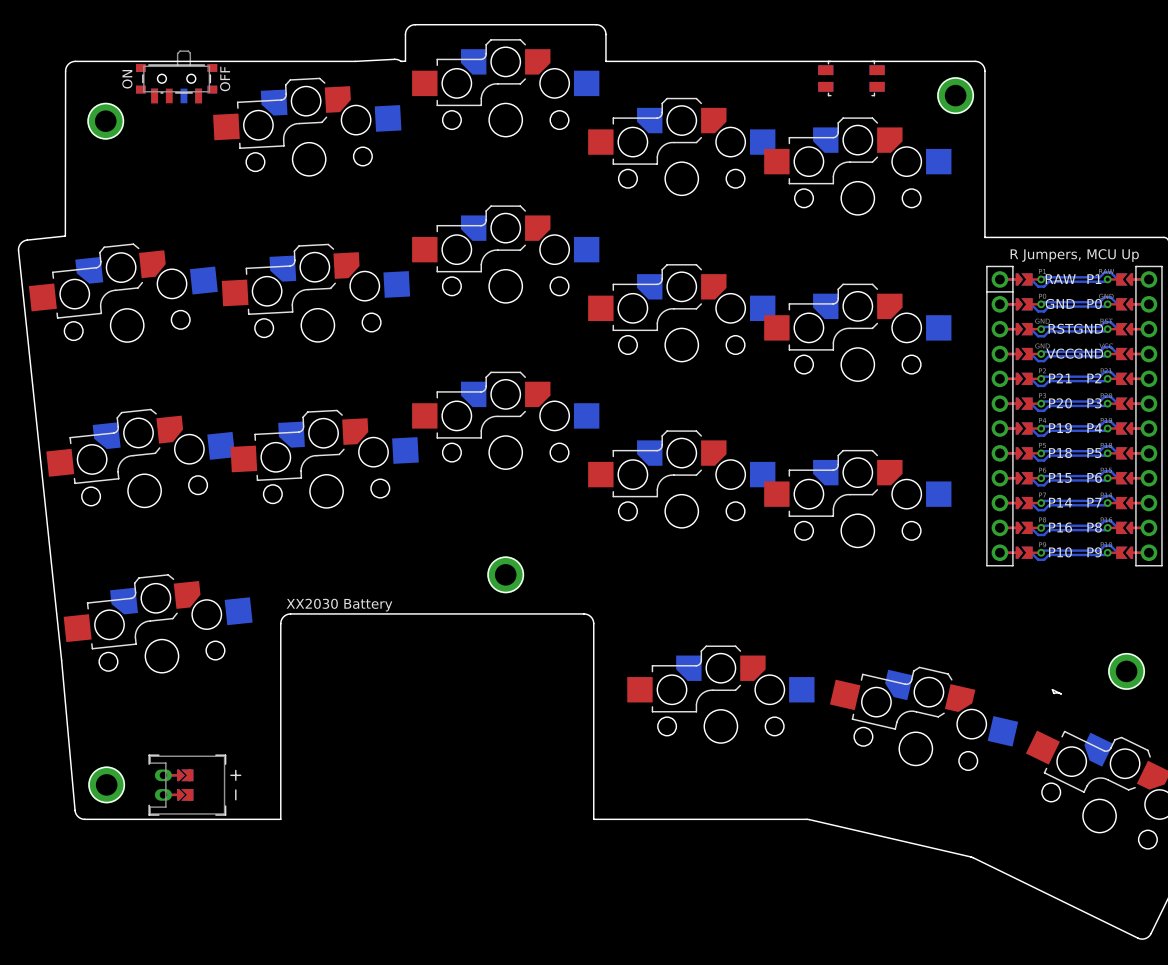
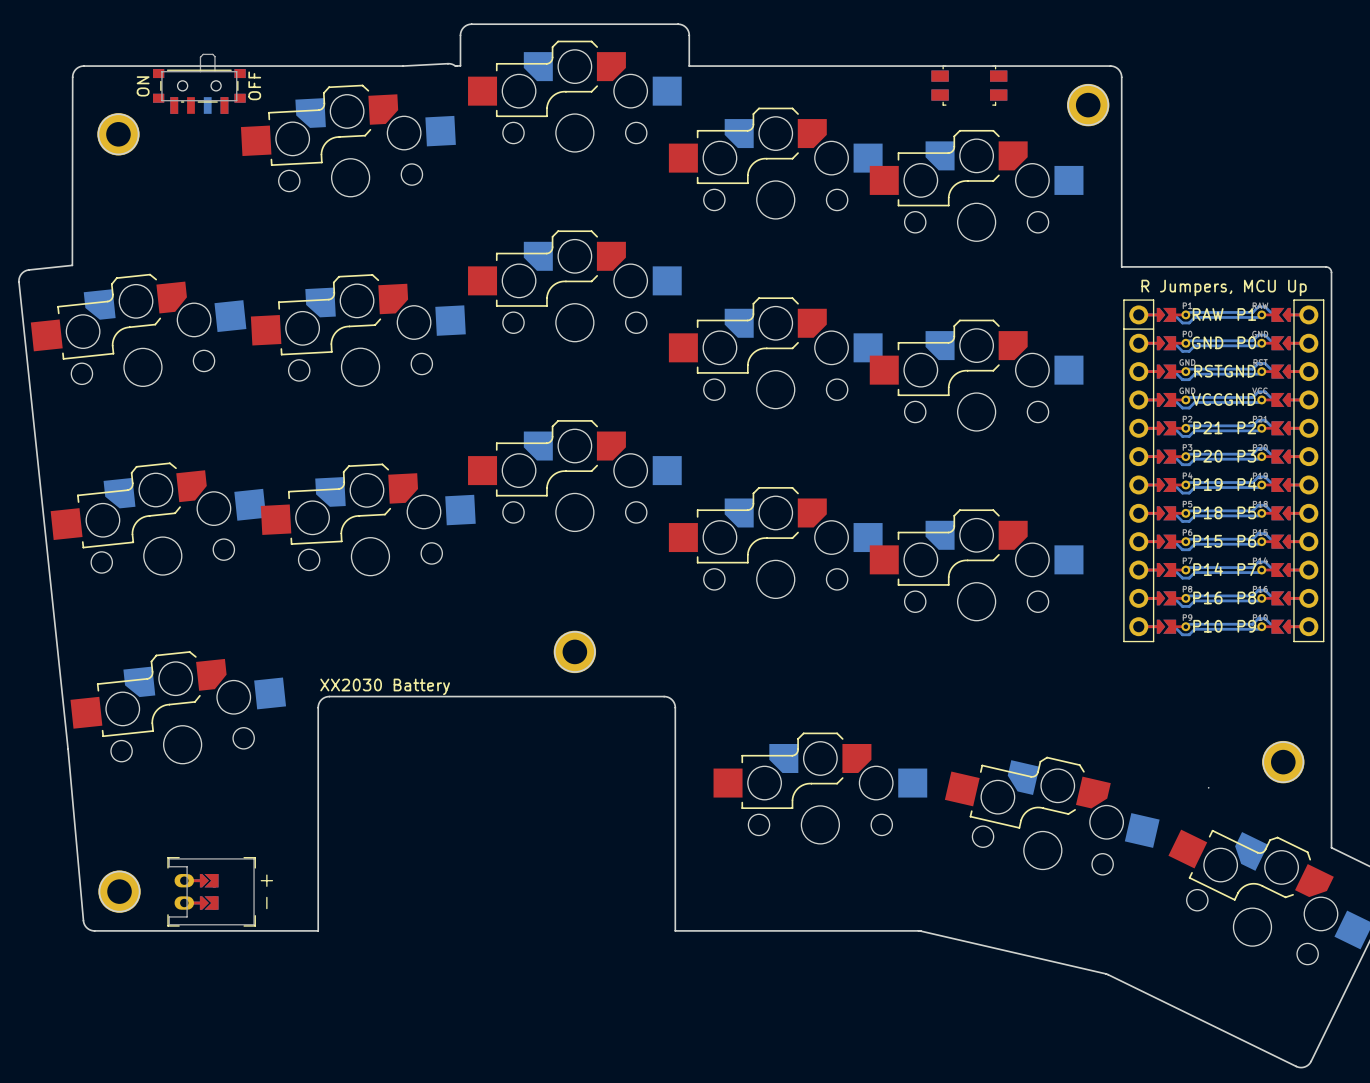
board edge: (1052, 689) (1061, 693) (1053, 693) (1052, 689) -> none

